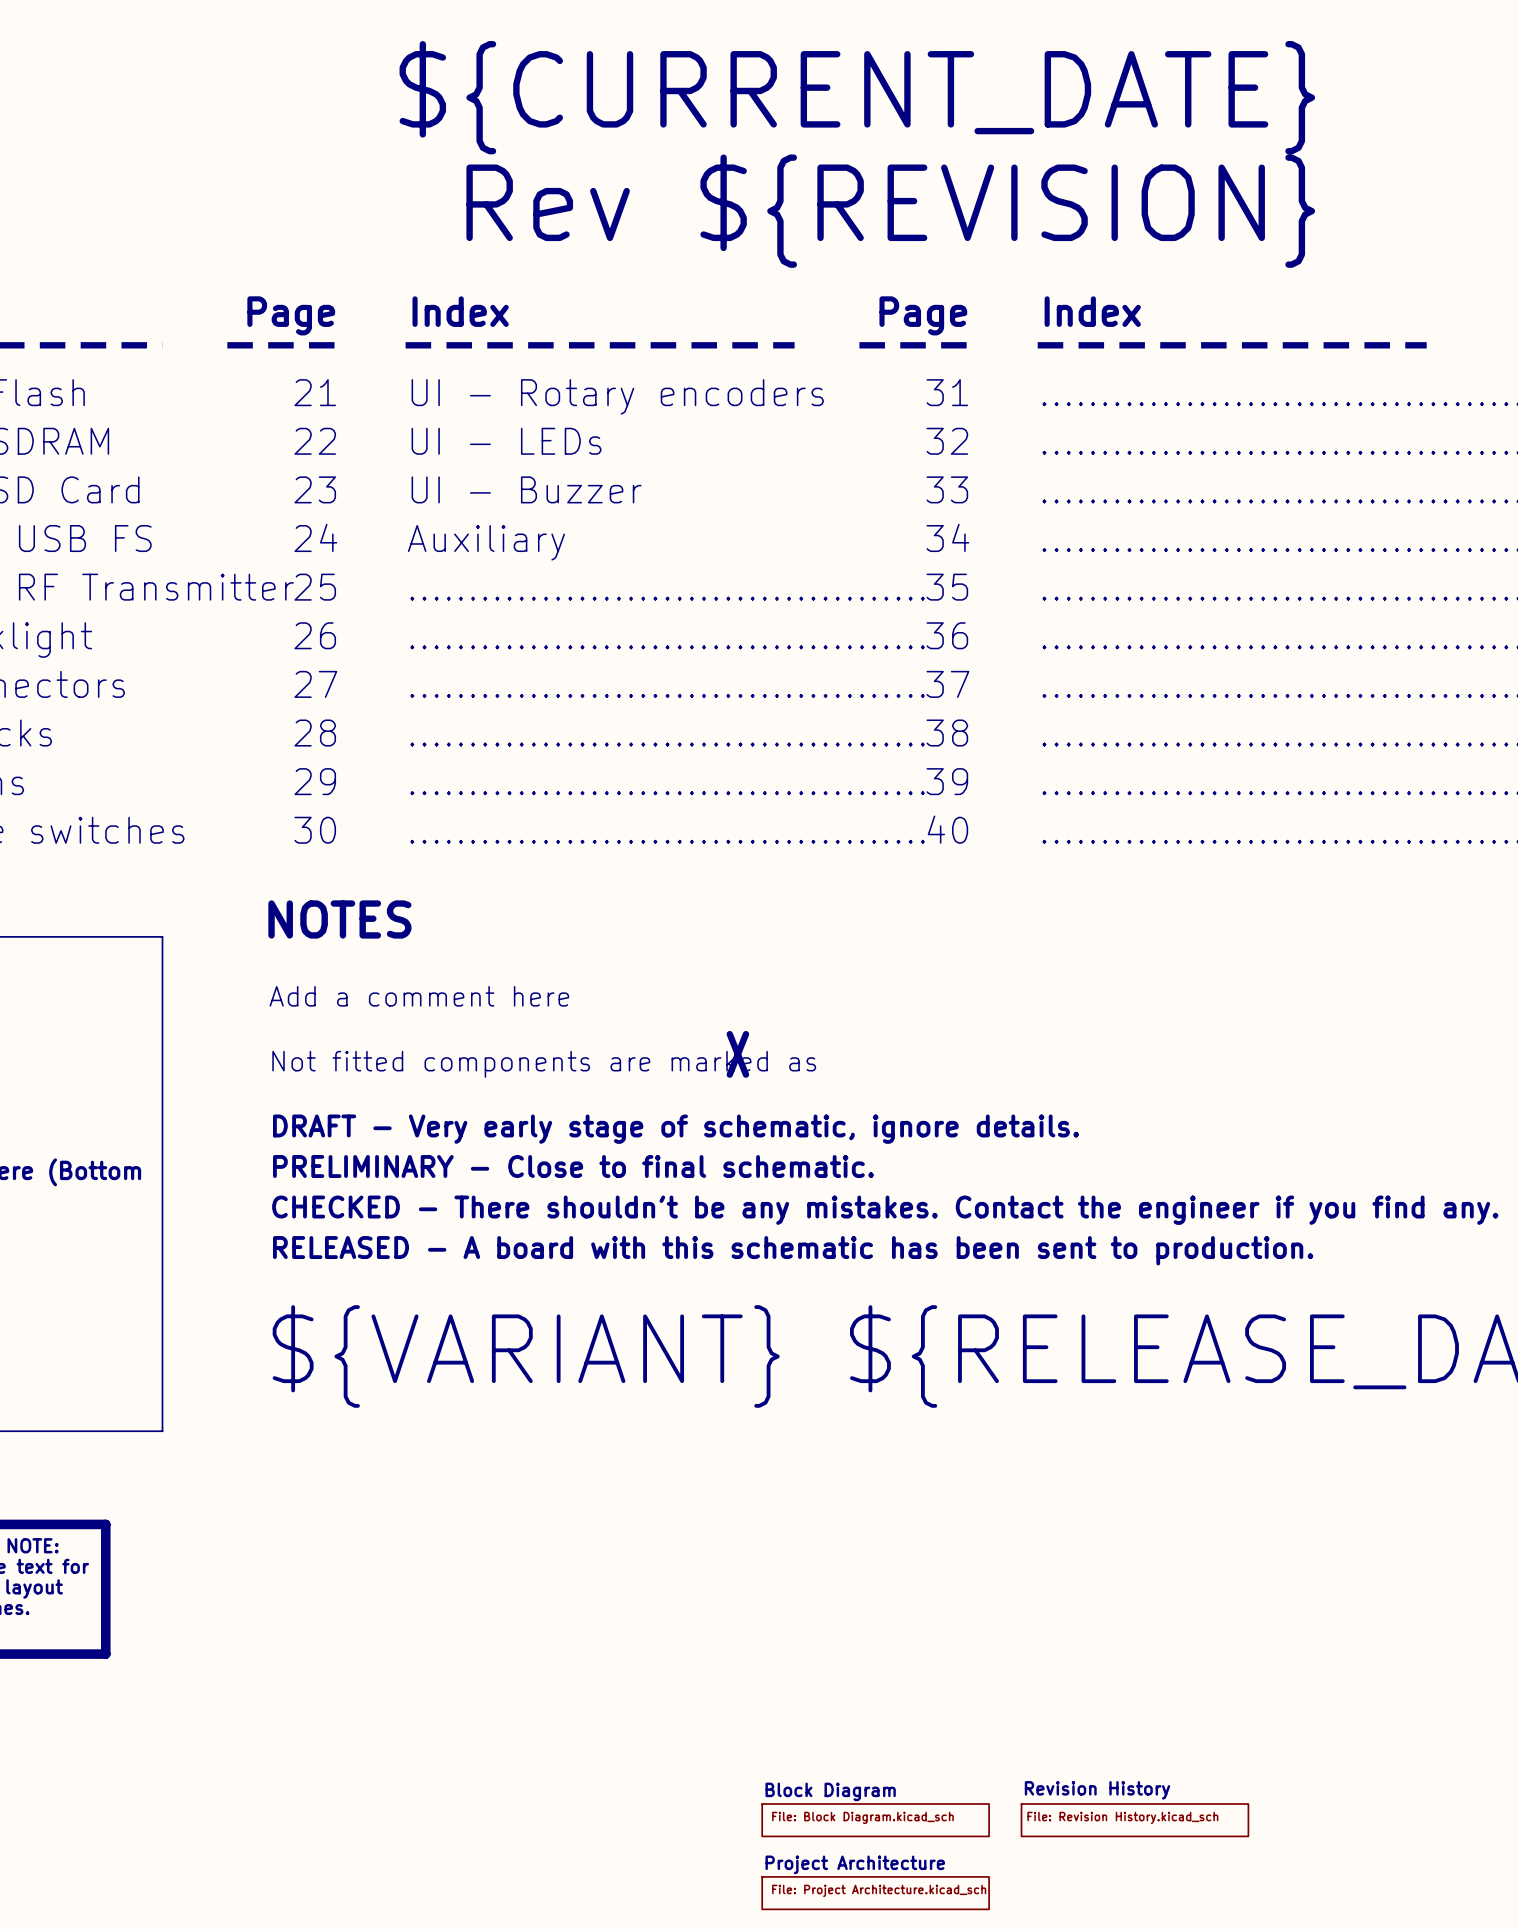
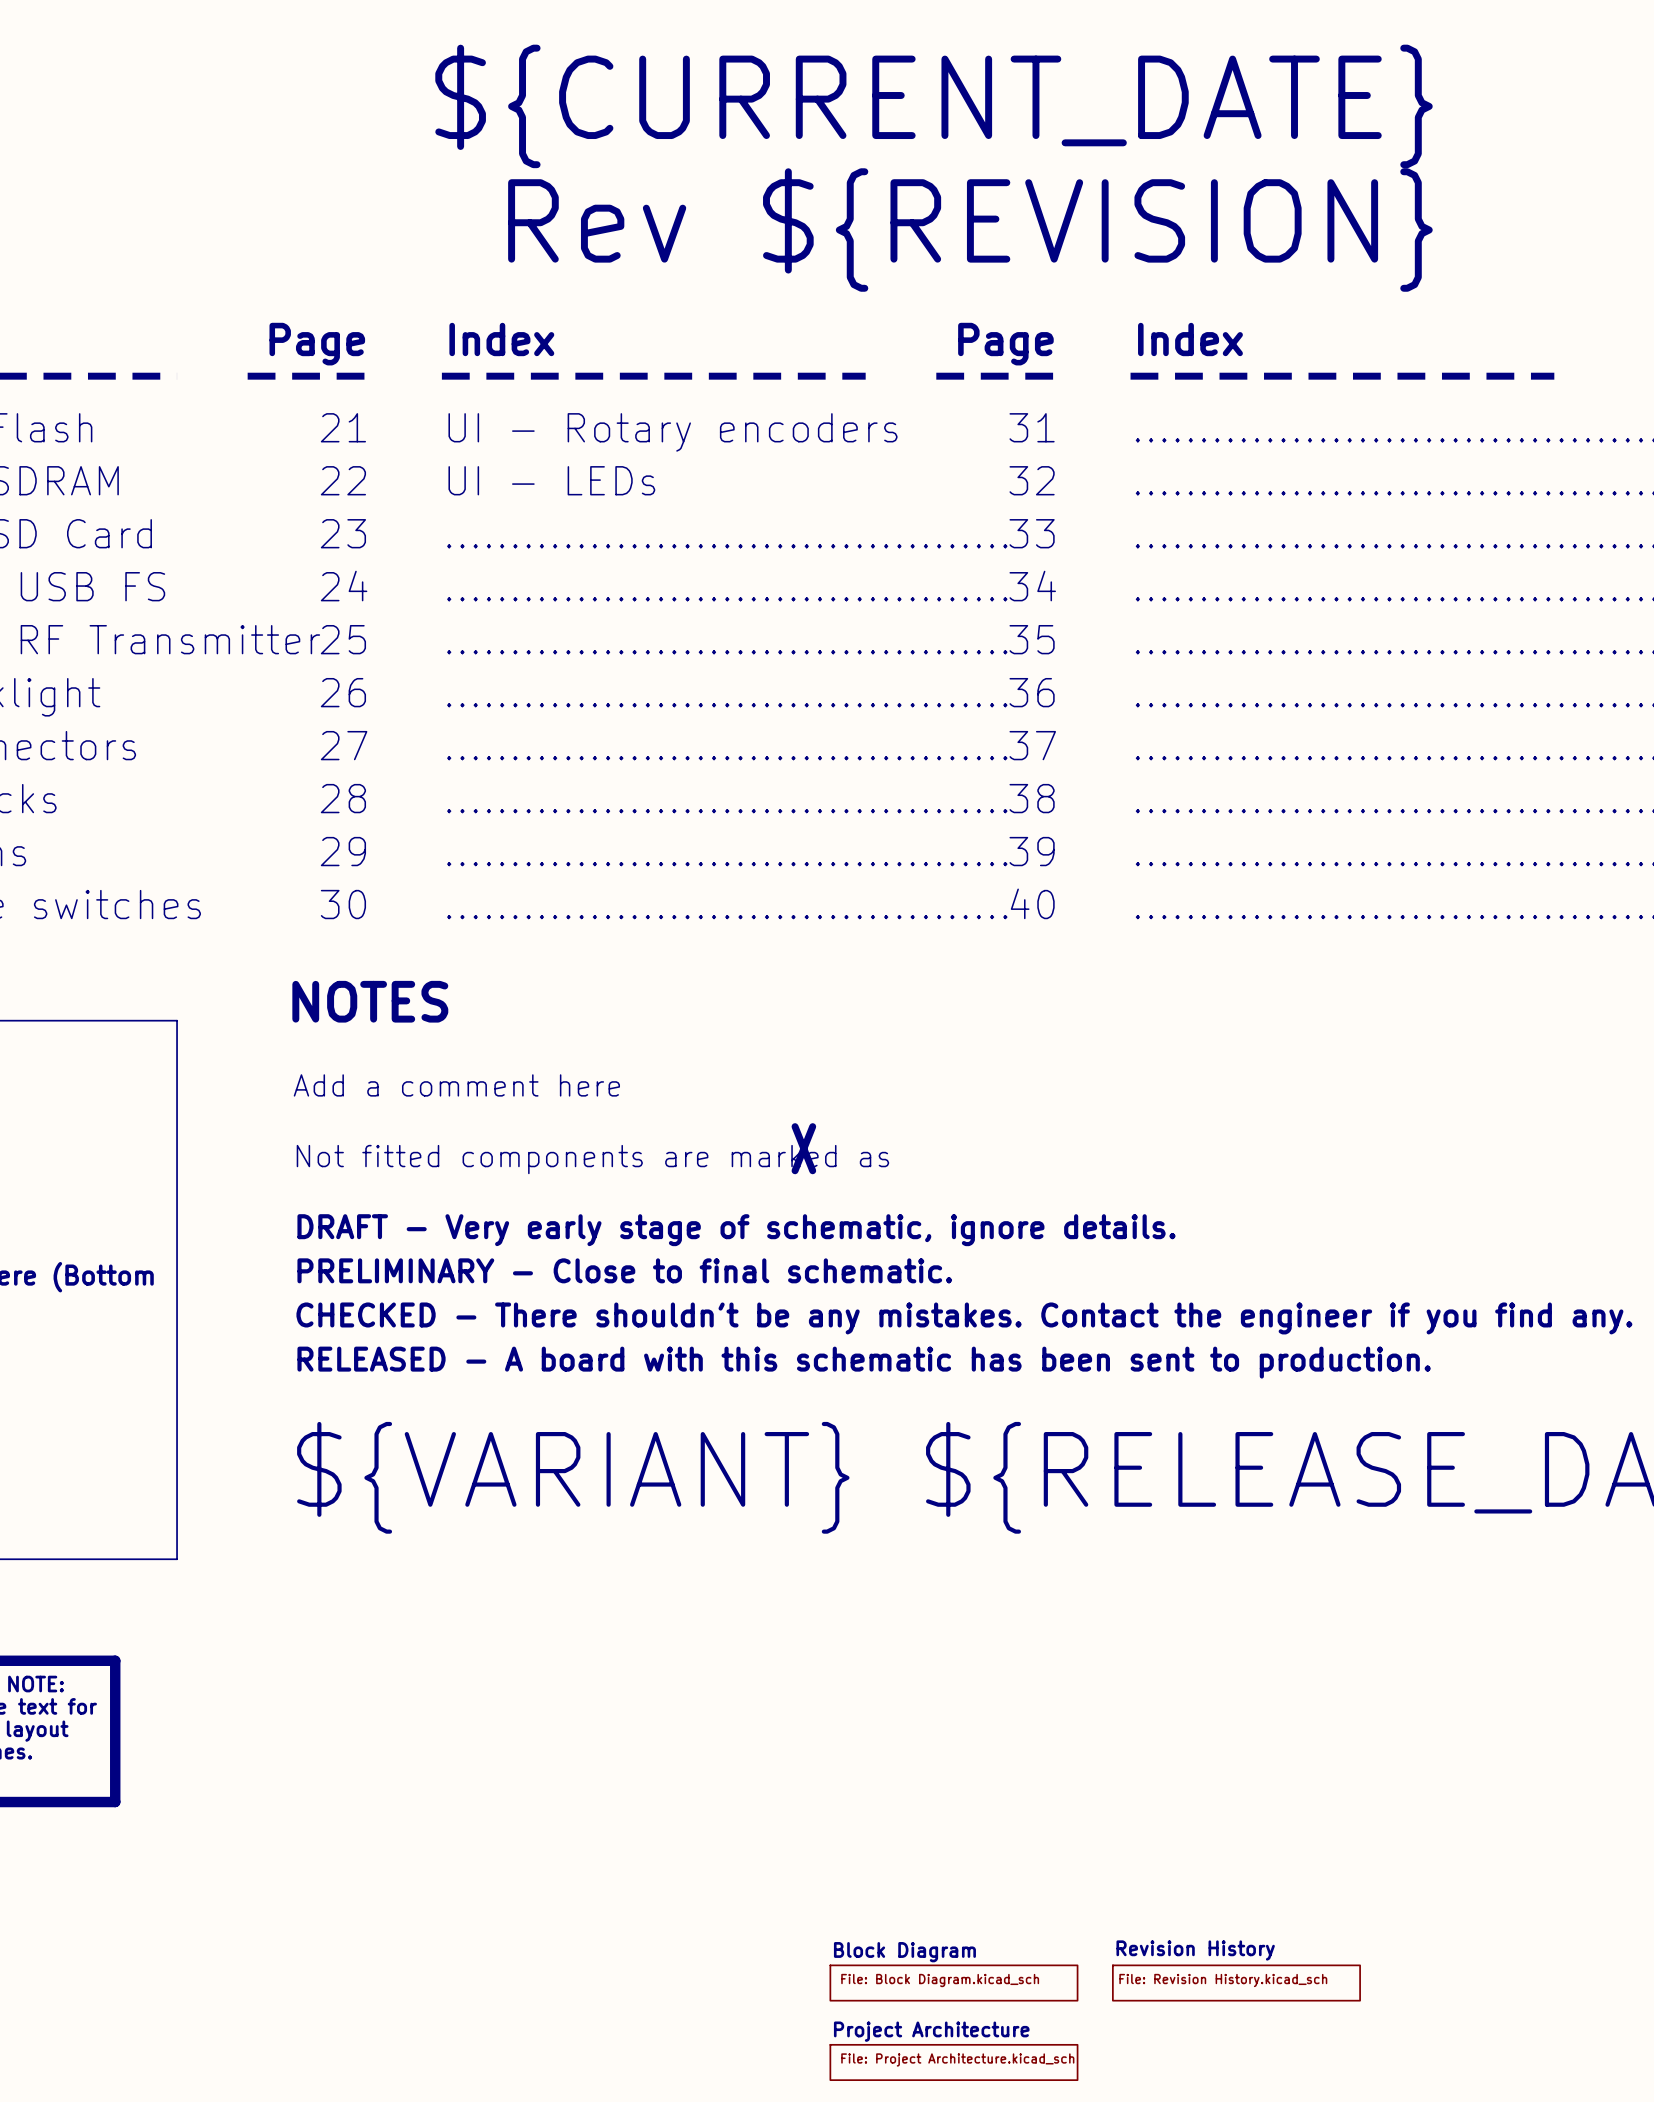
text: UI - Buzzer (526, 489) -> ........................................... (727, 546)
text: Auxiliary (486, 542) -> ........................................... (727, 599)

